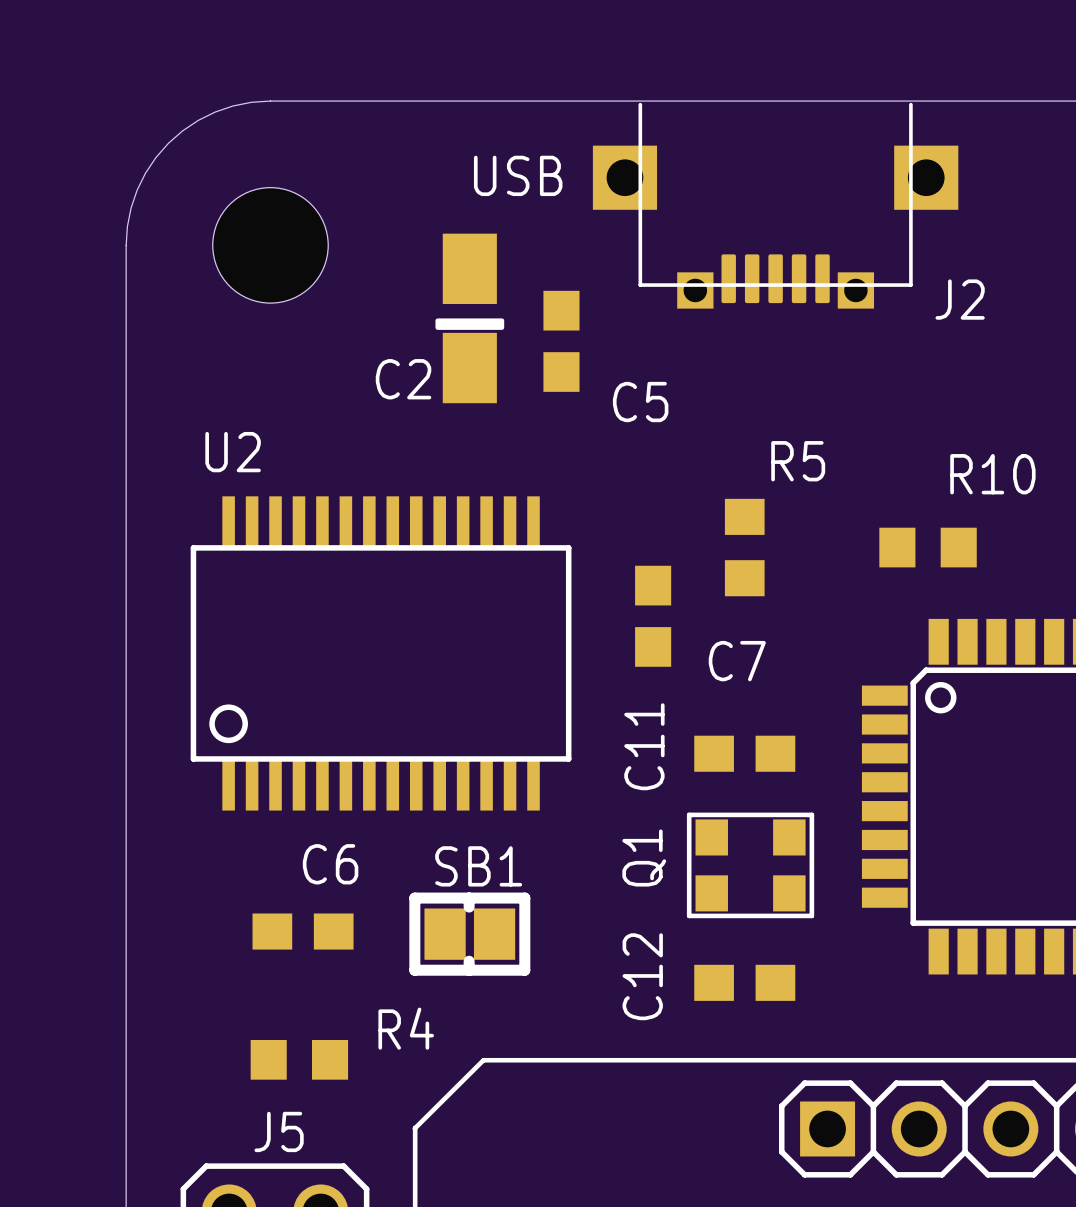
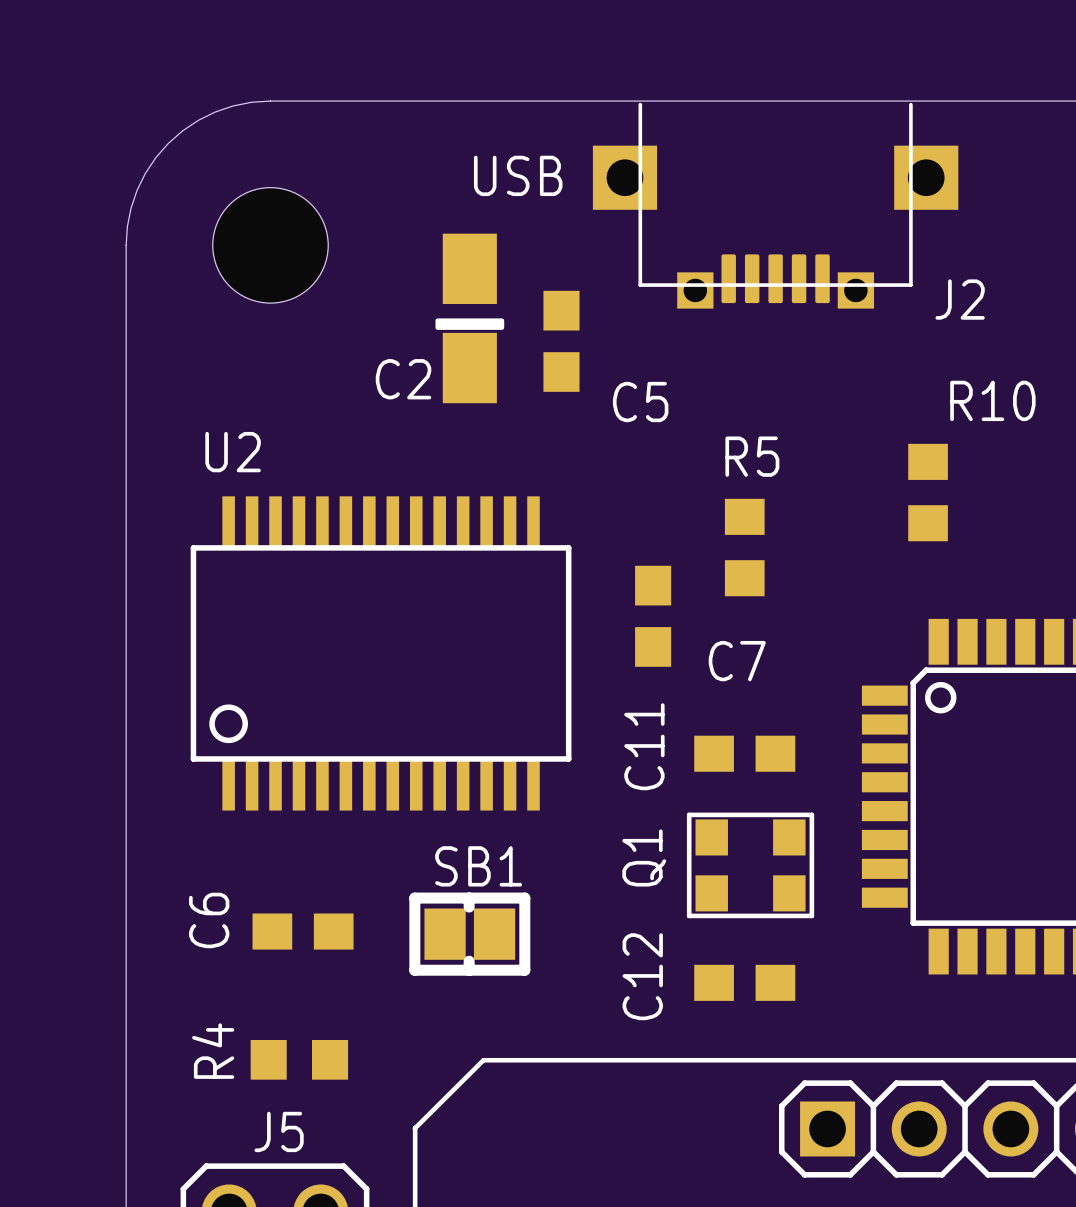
R5 name position: R5 (798, 461) -> R5 (752, 456)
R10 rotation: 0° (928, 547) -> 90° clockwise (928, 492)
C6 name rotation: 0° (330, 864) -> 90° counterclockwise (209, 920)
C6 name position: C6 (330, 864) -> C6 (209, 920)
R4 name rotation: 0° (406, 1028) -> 90° counterclockwise (213, 1051)
R4 name position: R4 (406, 1028) -> R4 (213, 1051)

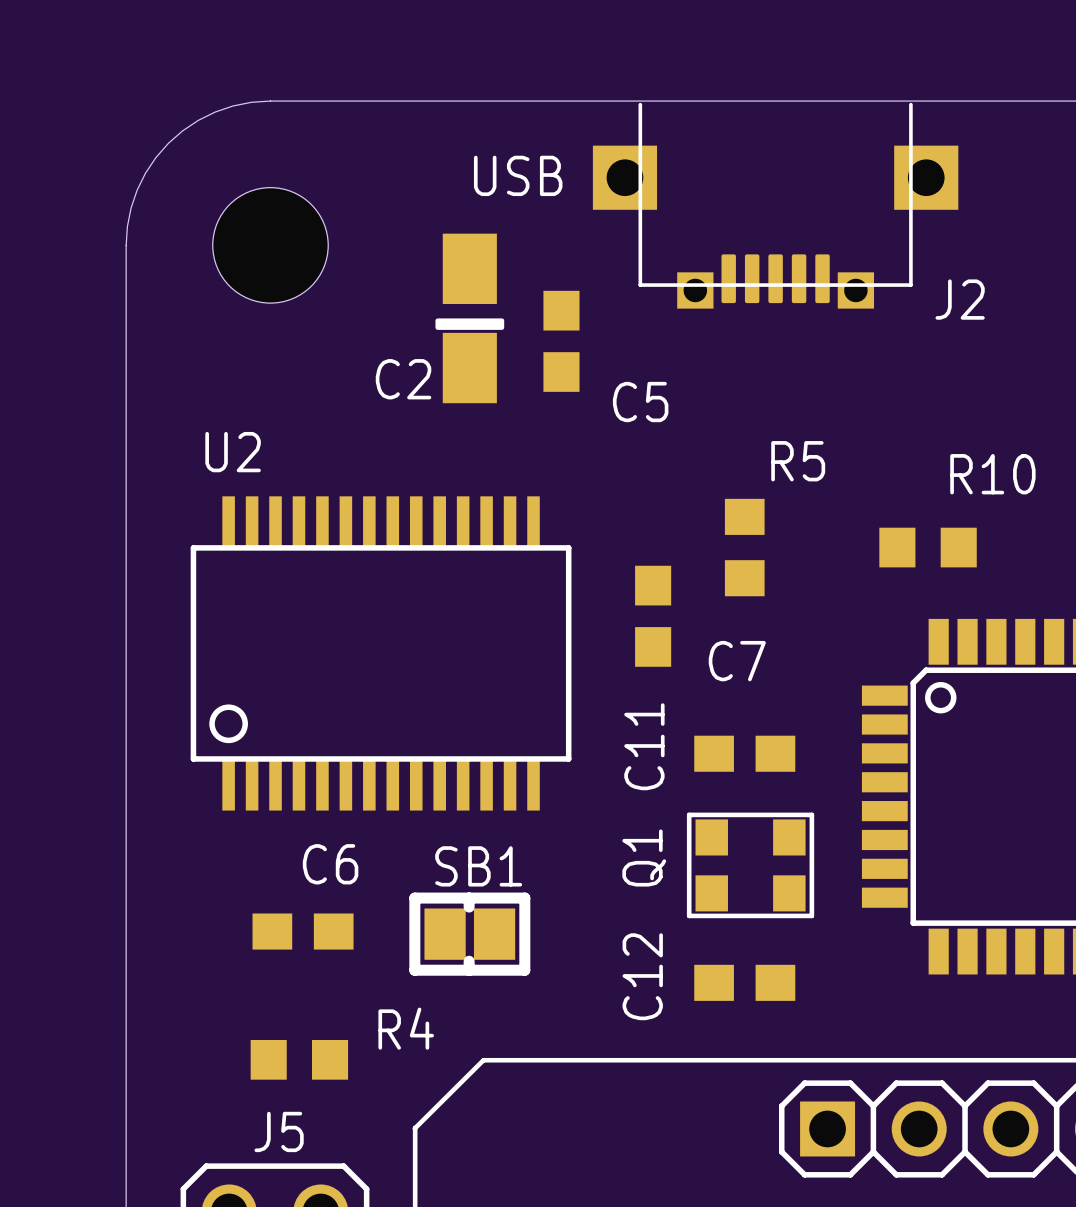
R5 name position: R5 (752, 456) -> R5 (798, 461)
R10 rotation: 0° (928, 492) -> 90° clockwise (928, 547)
C6 name rotation: 0° (209, 920) -> 90° clockwise (330, 864)
C6 name position: C6 (209, 920) -> C6 (330, 864)
R4 name rotation: 0° (213, 1051) -> 90° clockwise (406, 1028)
R4 name position: R4 (213, 1051) -> R4 (406, 1028)

